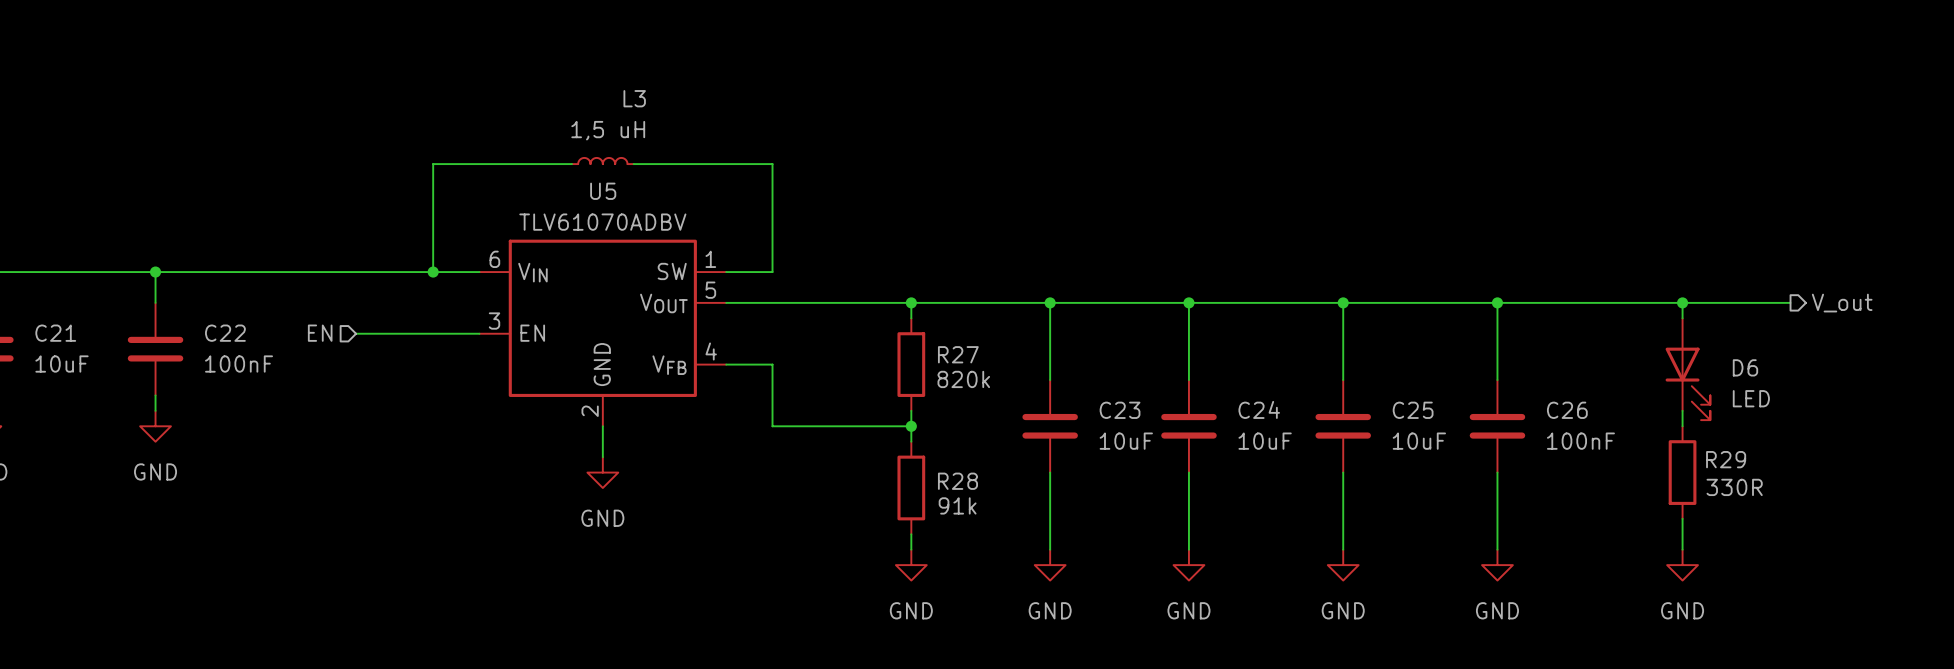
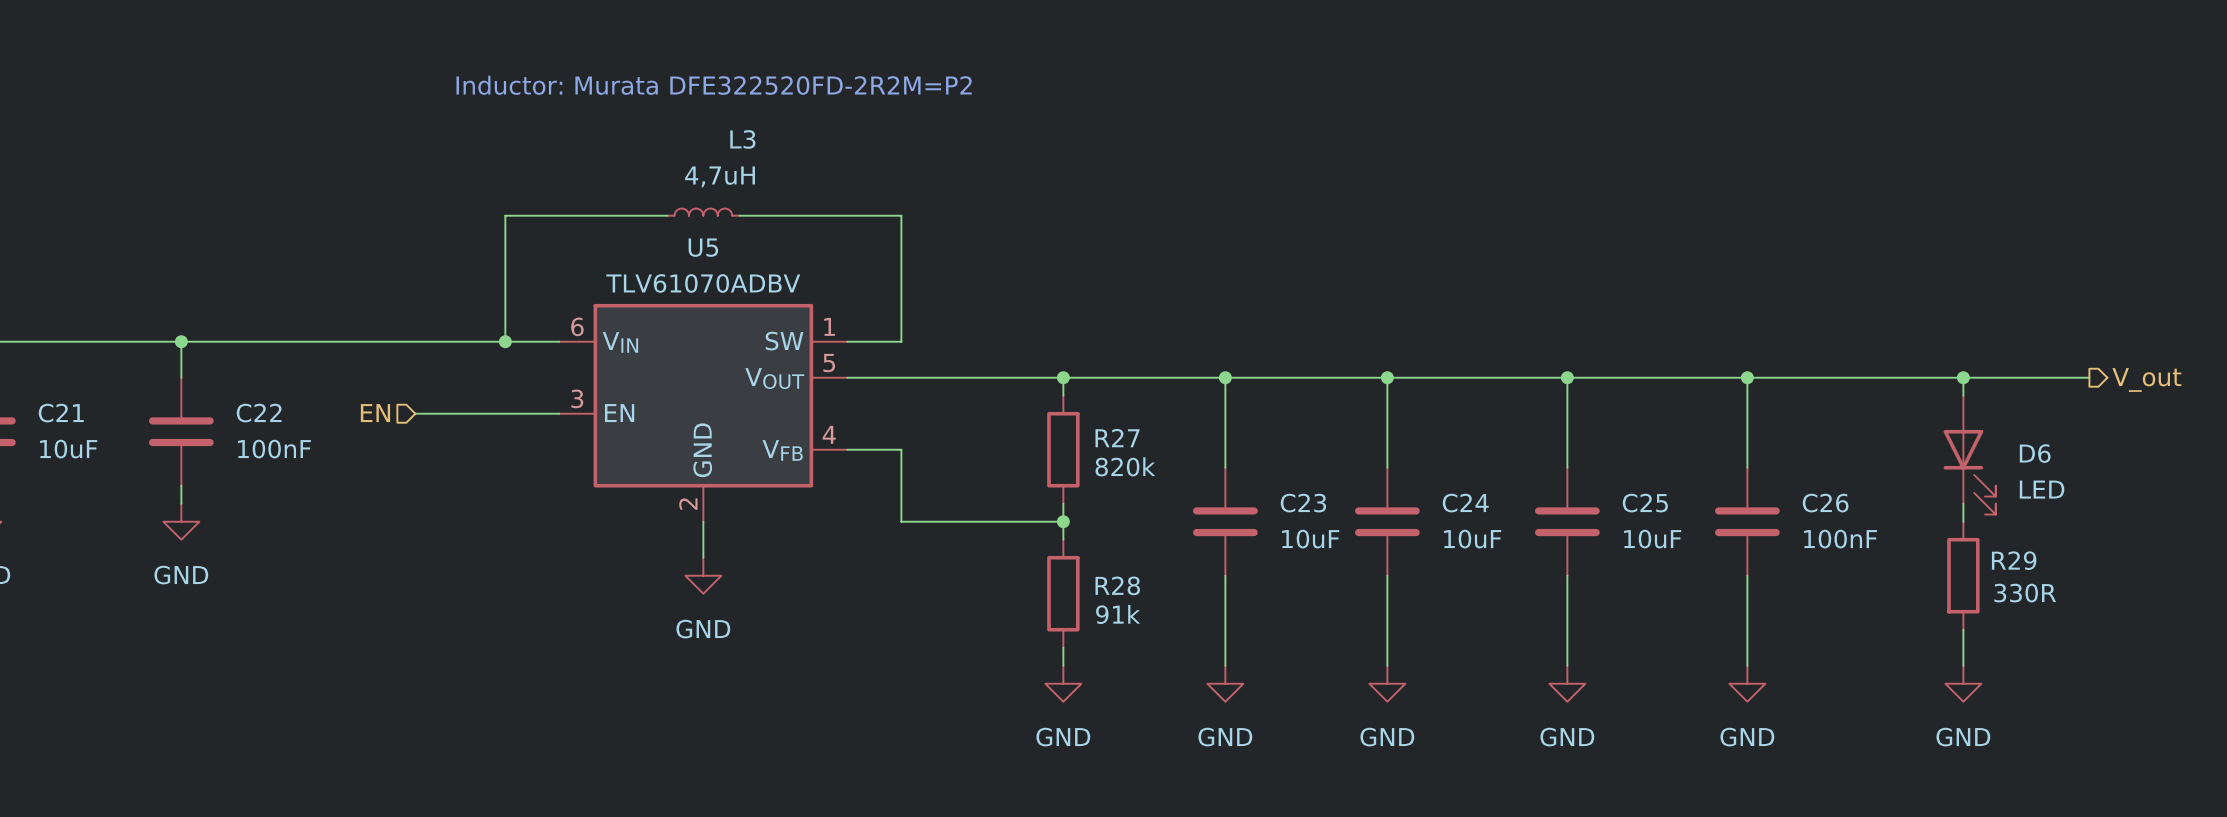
text: none -> Inductor: Murata DFE322520FD-2R2M=P2 (714, 85)
L3 value: 1,5 uH (608, 130) -> 4,7uH (720, 176)

